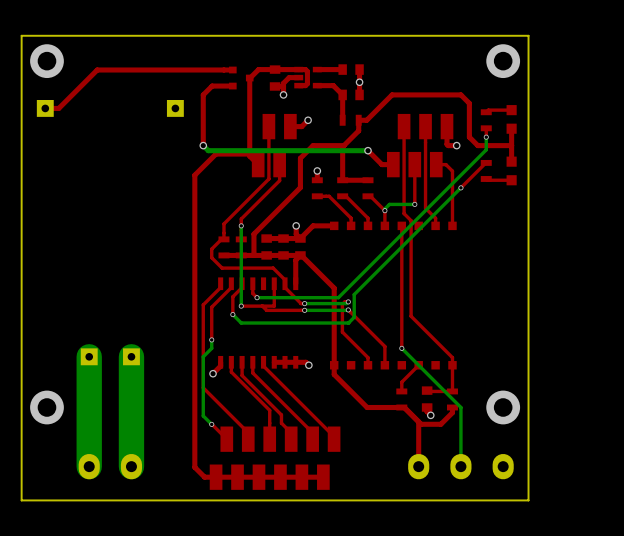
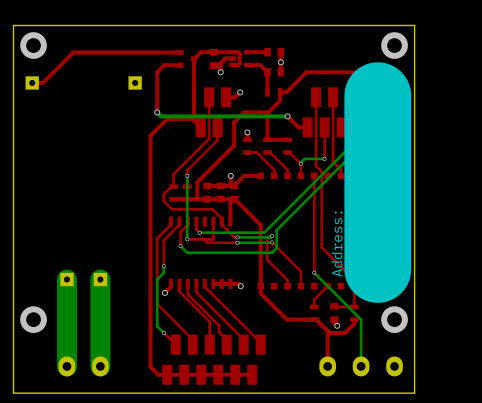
line: none -> (377, 95) (377, 269)
text: none -> Address: (337, 244)

